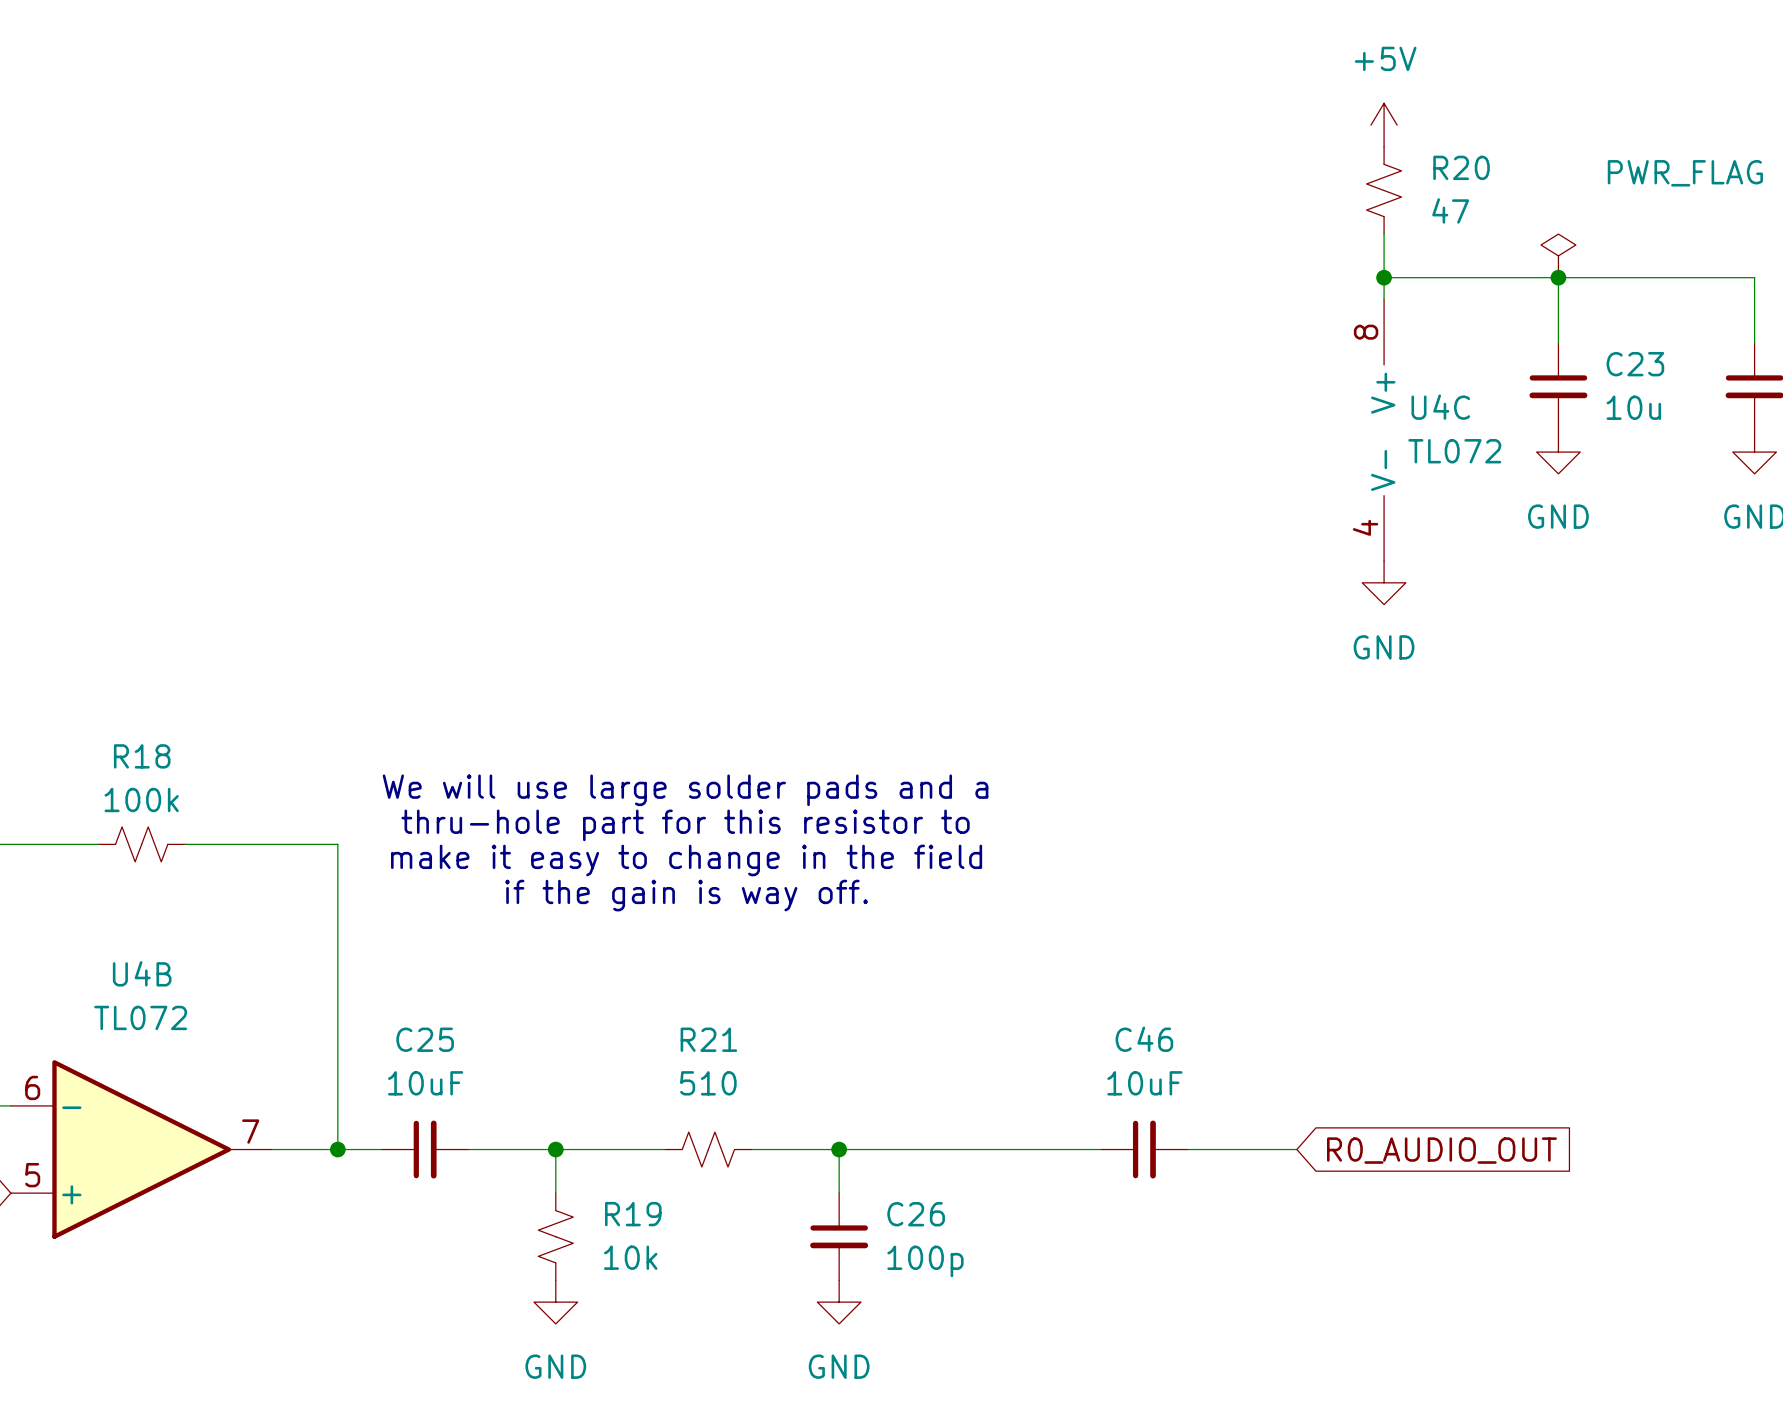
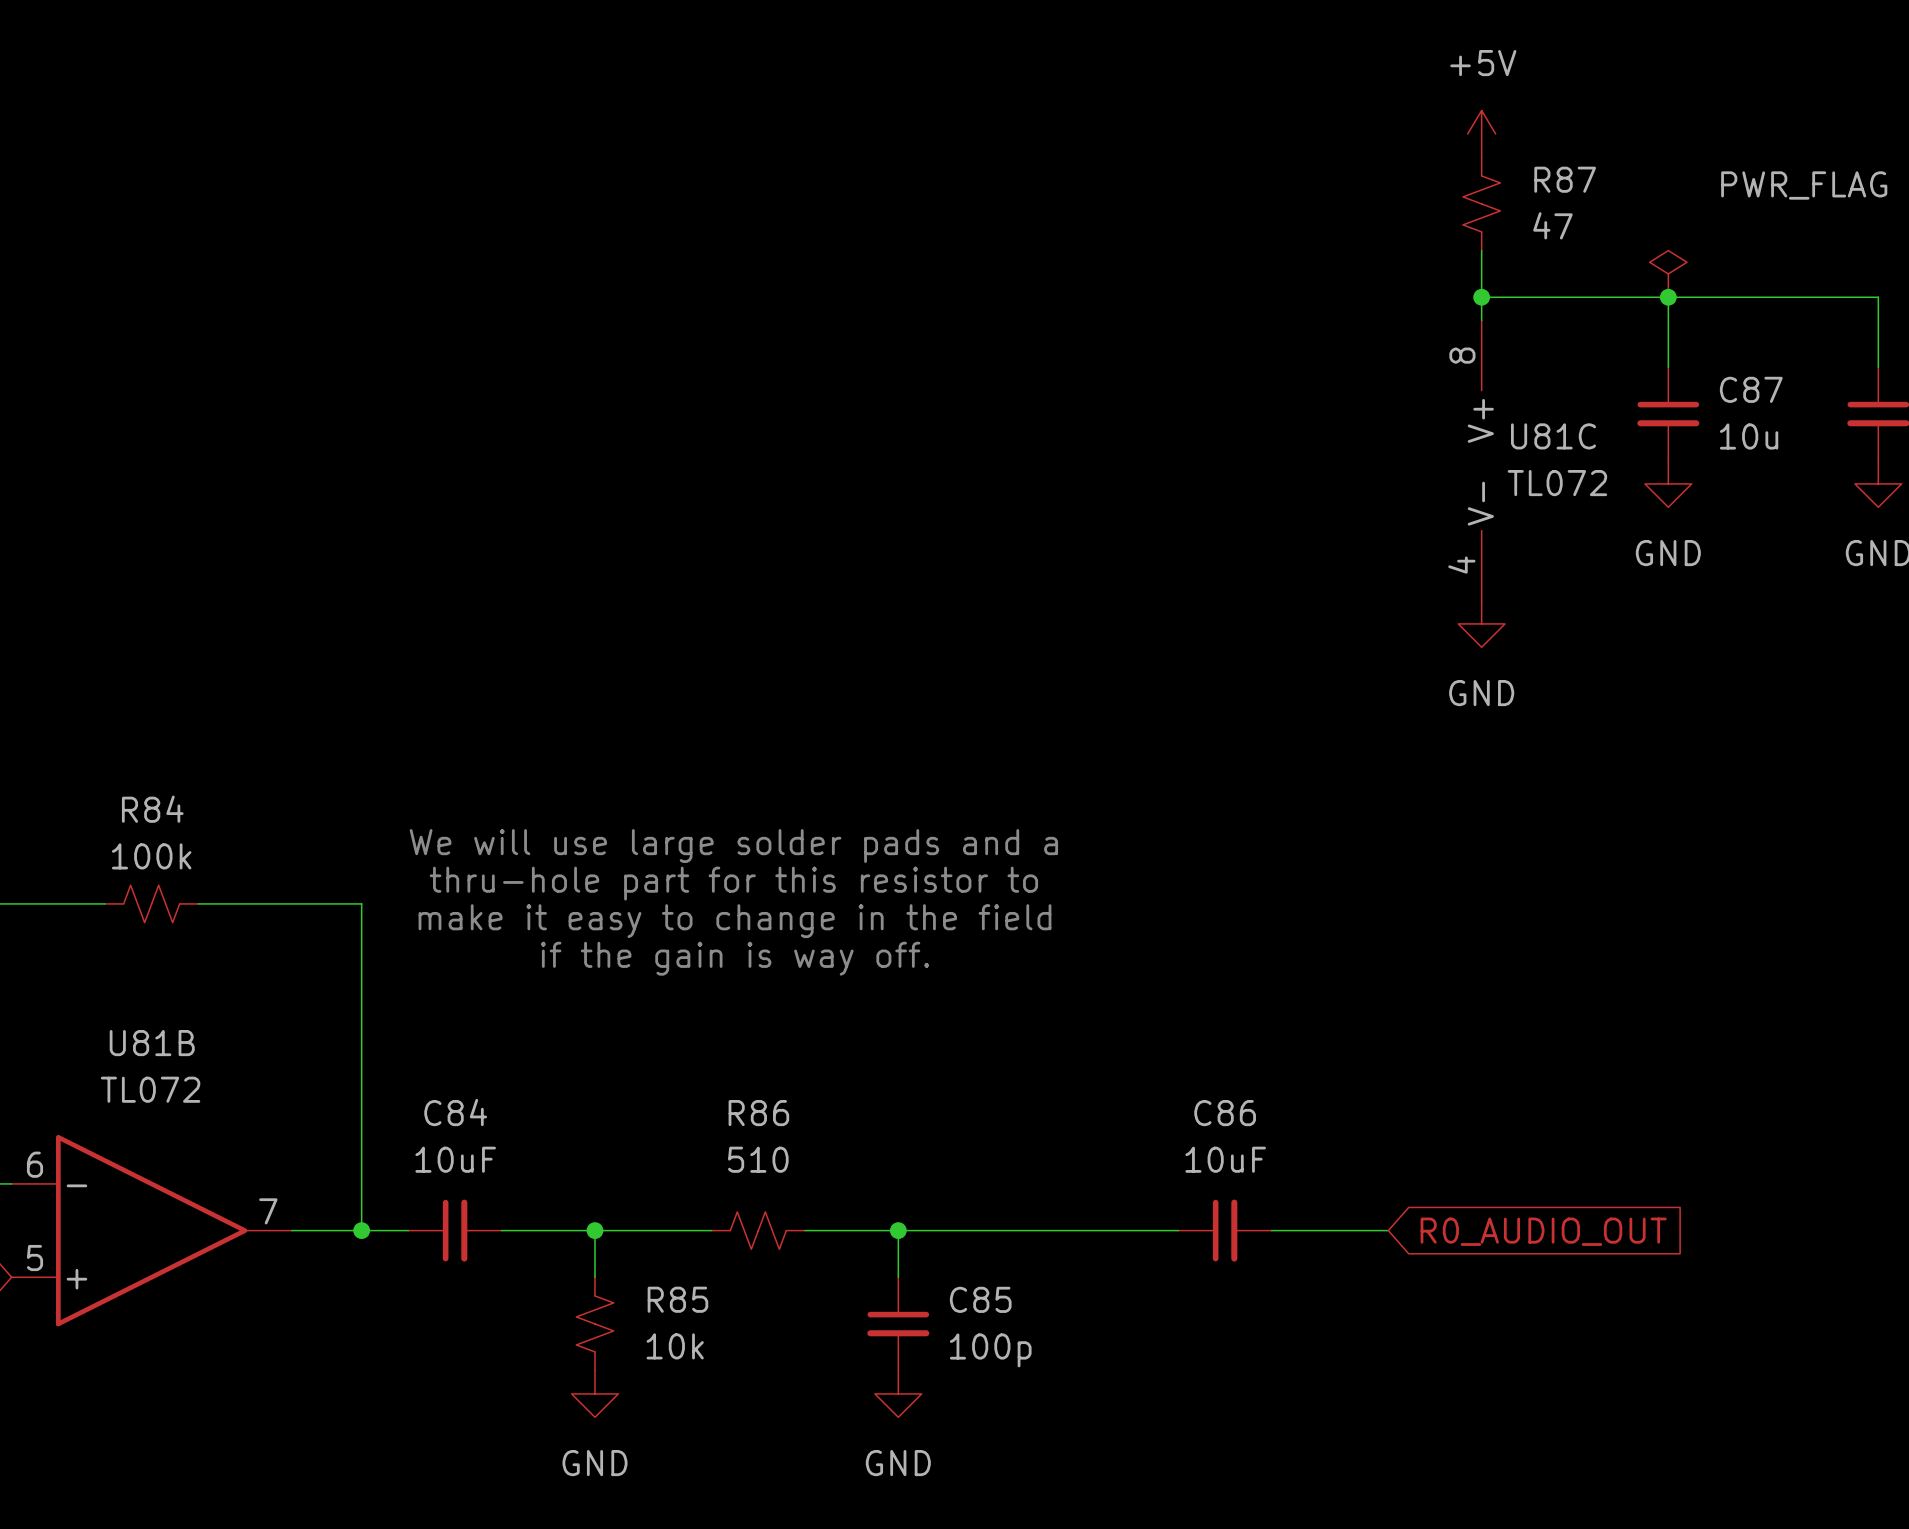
R20 name: R20 (1461, 167) -> R87 (1565, 179)
C23 name: C23 (1635, 364) -> C87 (1751, 389)
U4C name: U4C (1440, 407) -> U81C (1553, 436)
R18 name: R18 (142, 756) -> R84 (152, 809)
U4B name: U4B (142, 973) -> U81B (152, 1043)
C25 name: C25 (425, 1039) -> C84 (455, 1112)
R21 name: R21 (708, 1039) -> R86 (758, 1113)
C46 name: C46 (1144, 1039) -> C86 (1225, 1113)
R19 name: R19 (633, 1214) -> R85 (677, 1299)
C26 name: C26 (916, 1214) -> C85 (980, 1299)

